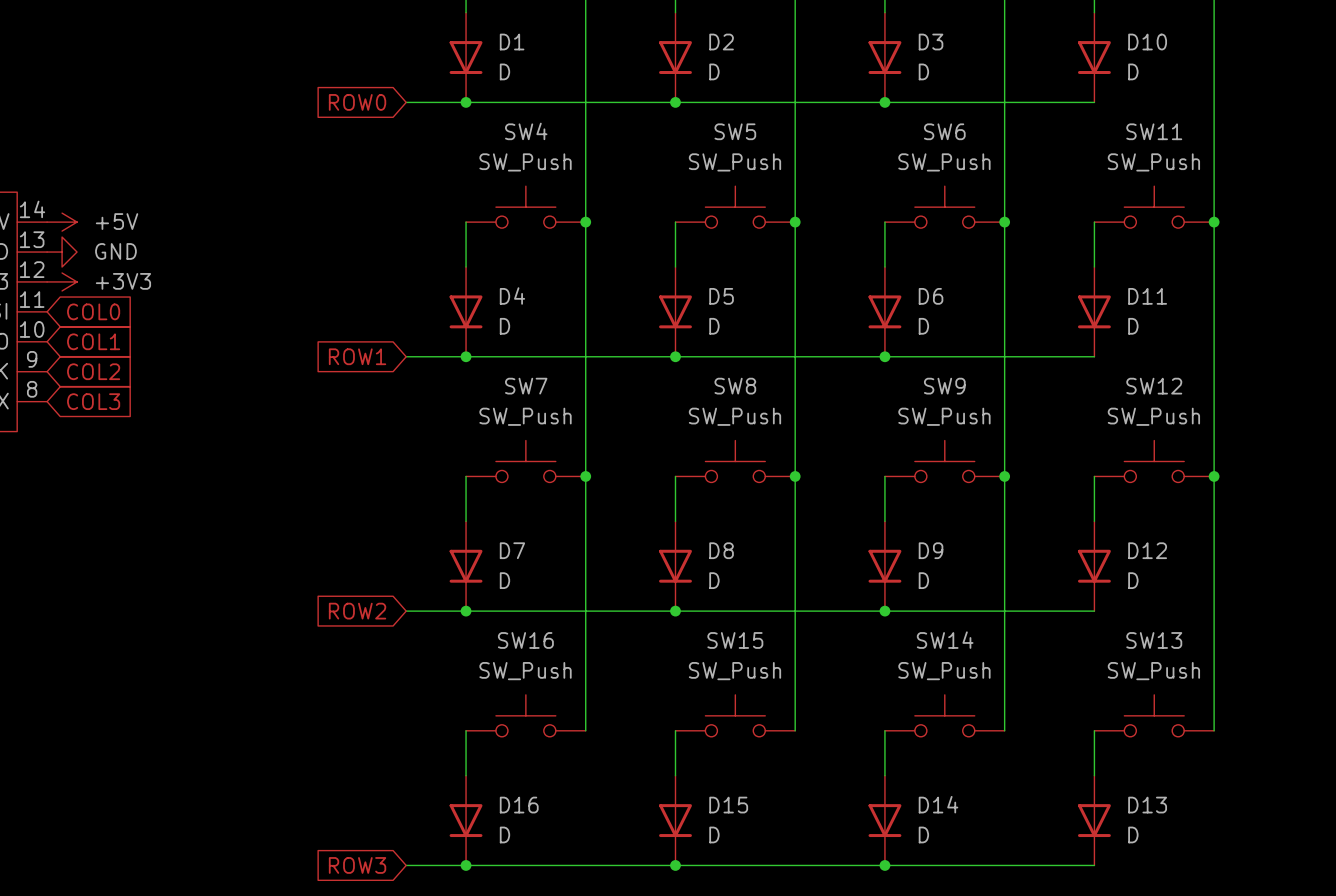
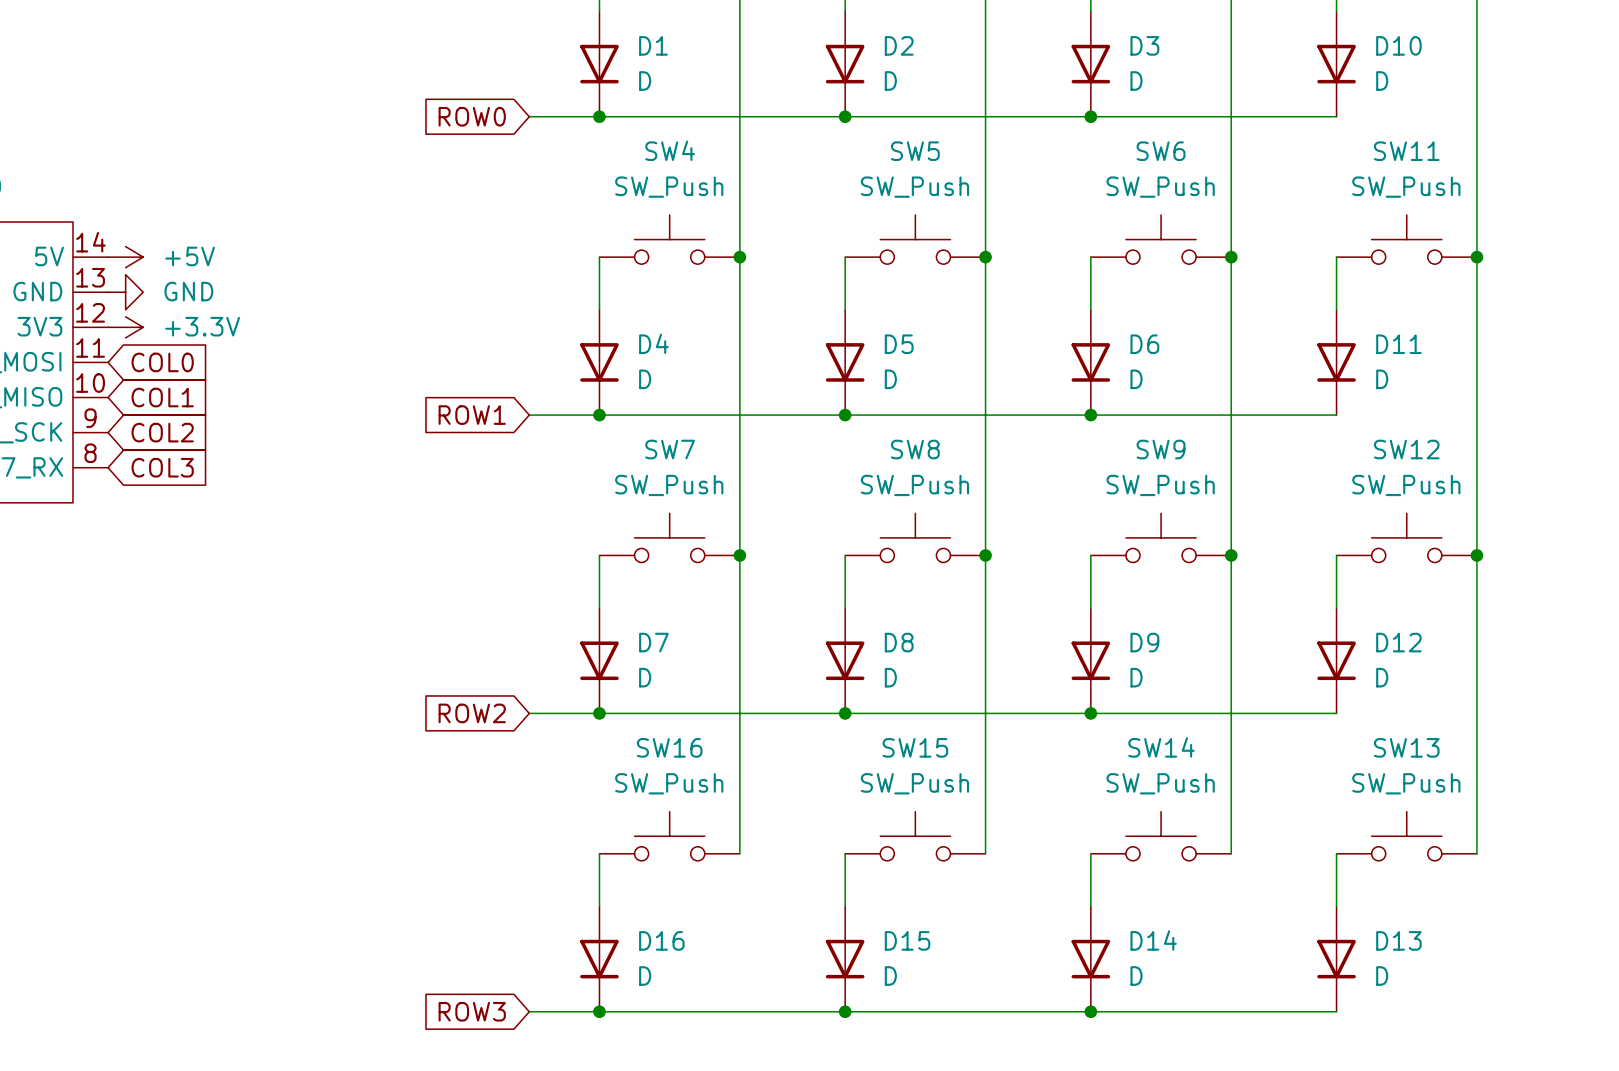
power symbol: +3V3 (62, 281) -> +3.3V (125, 327)

